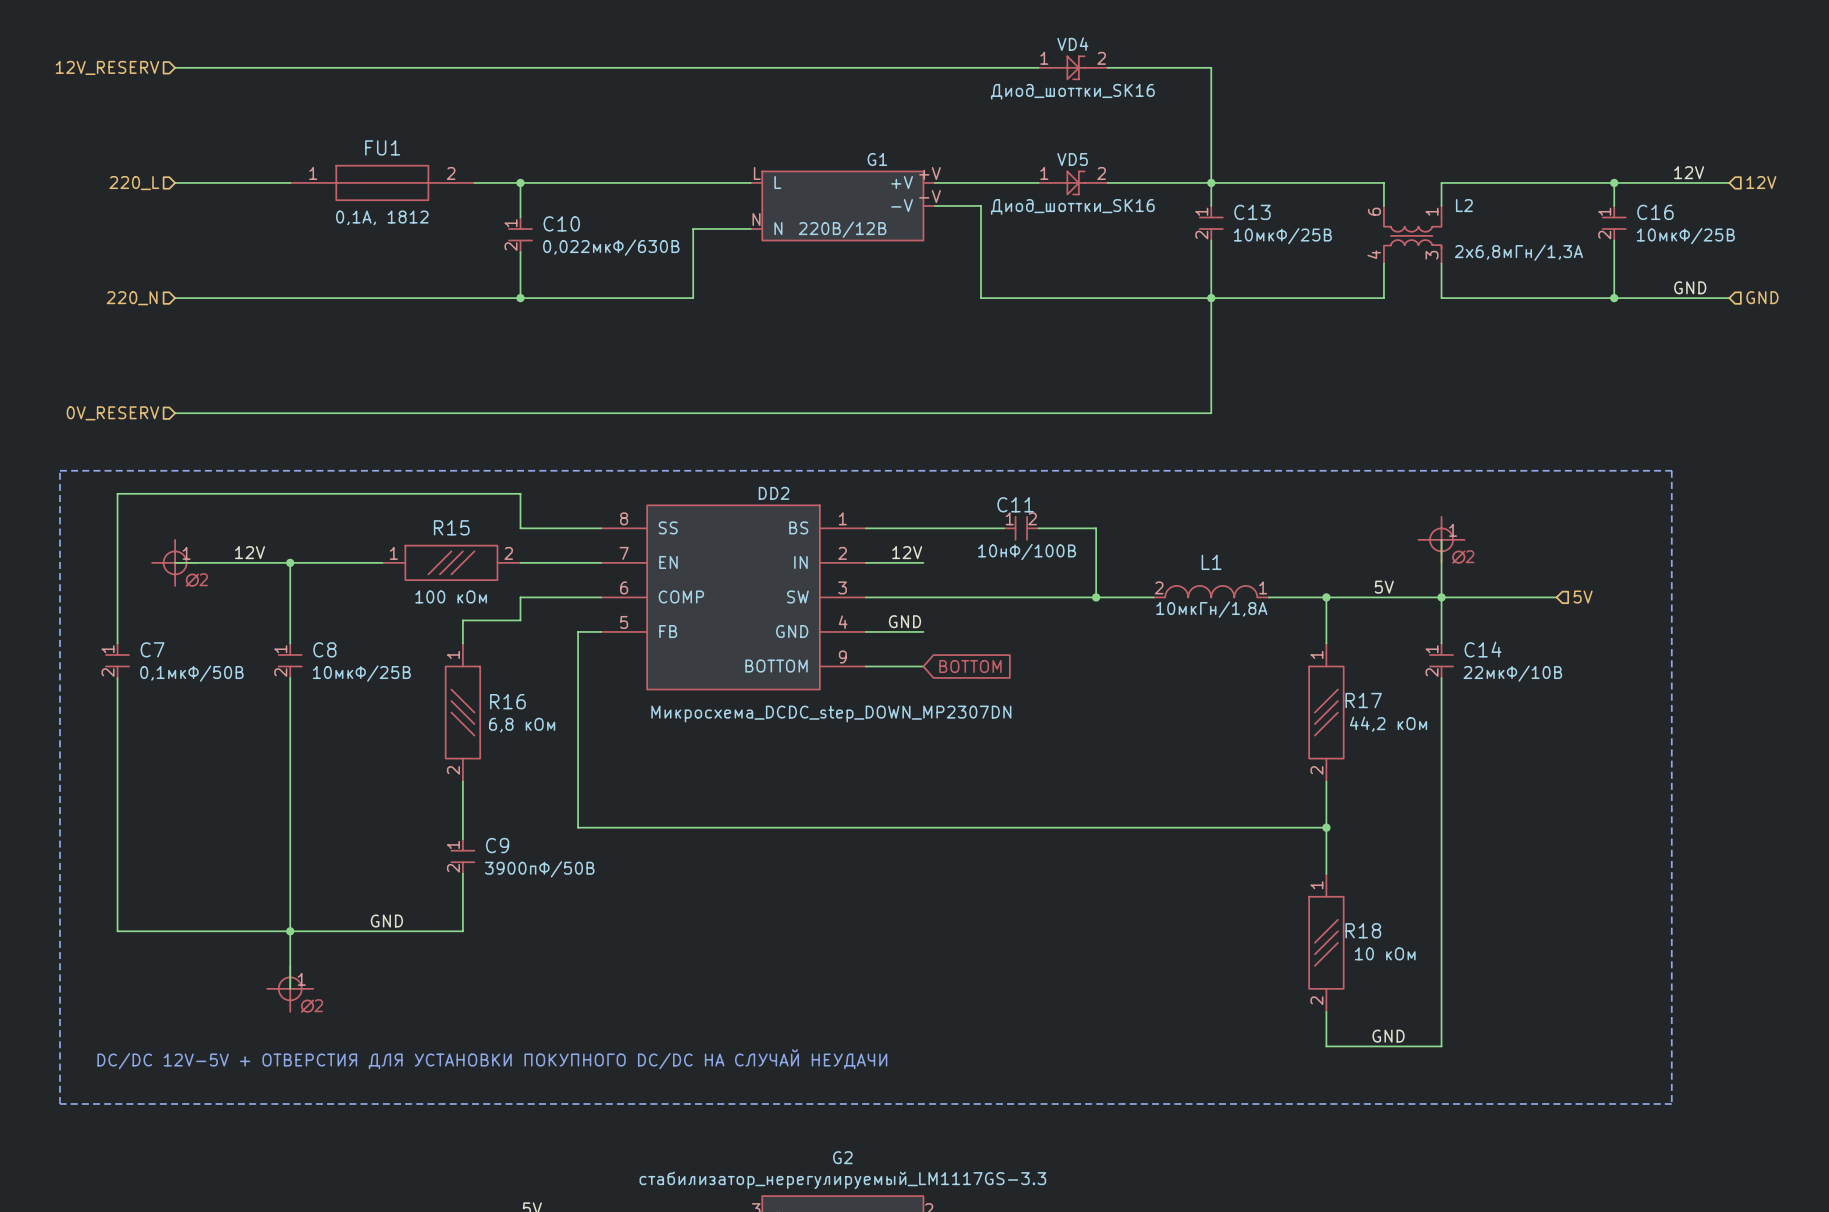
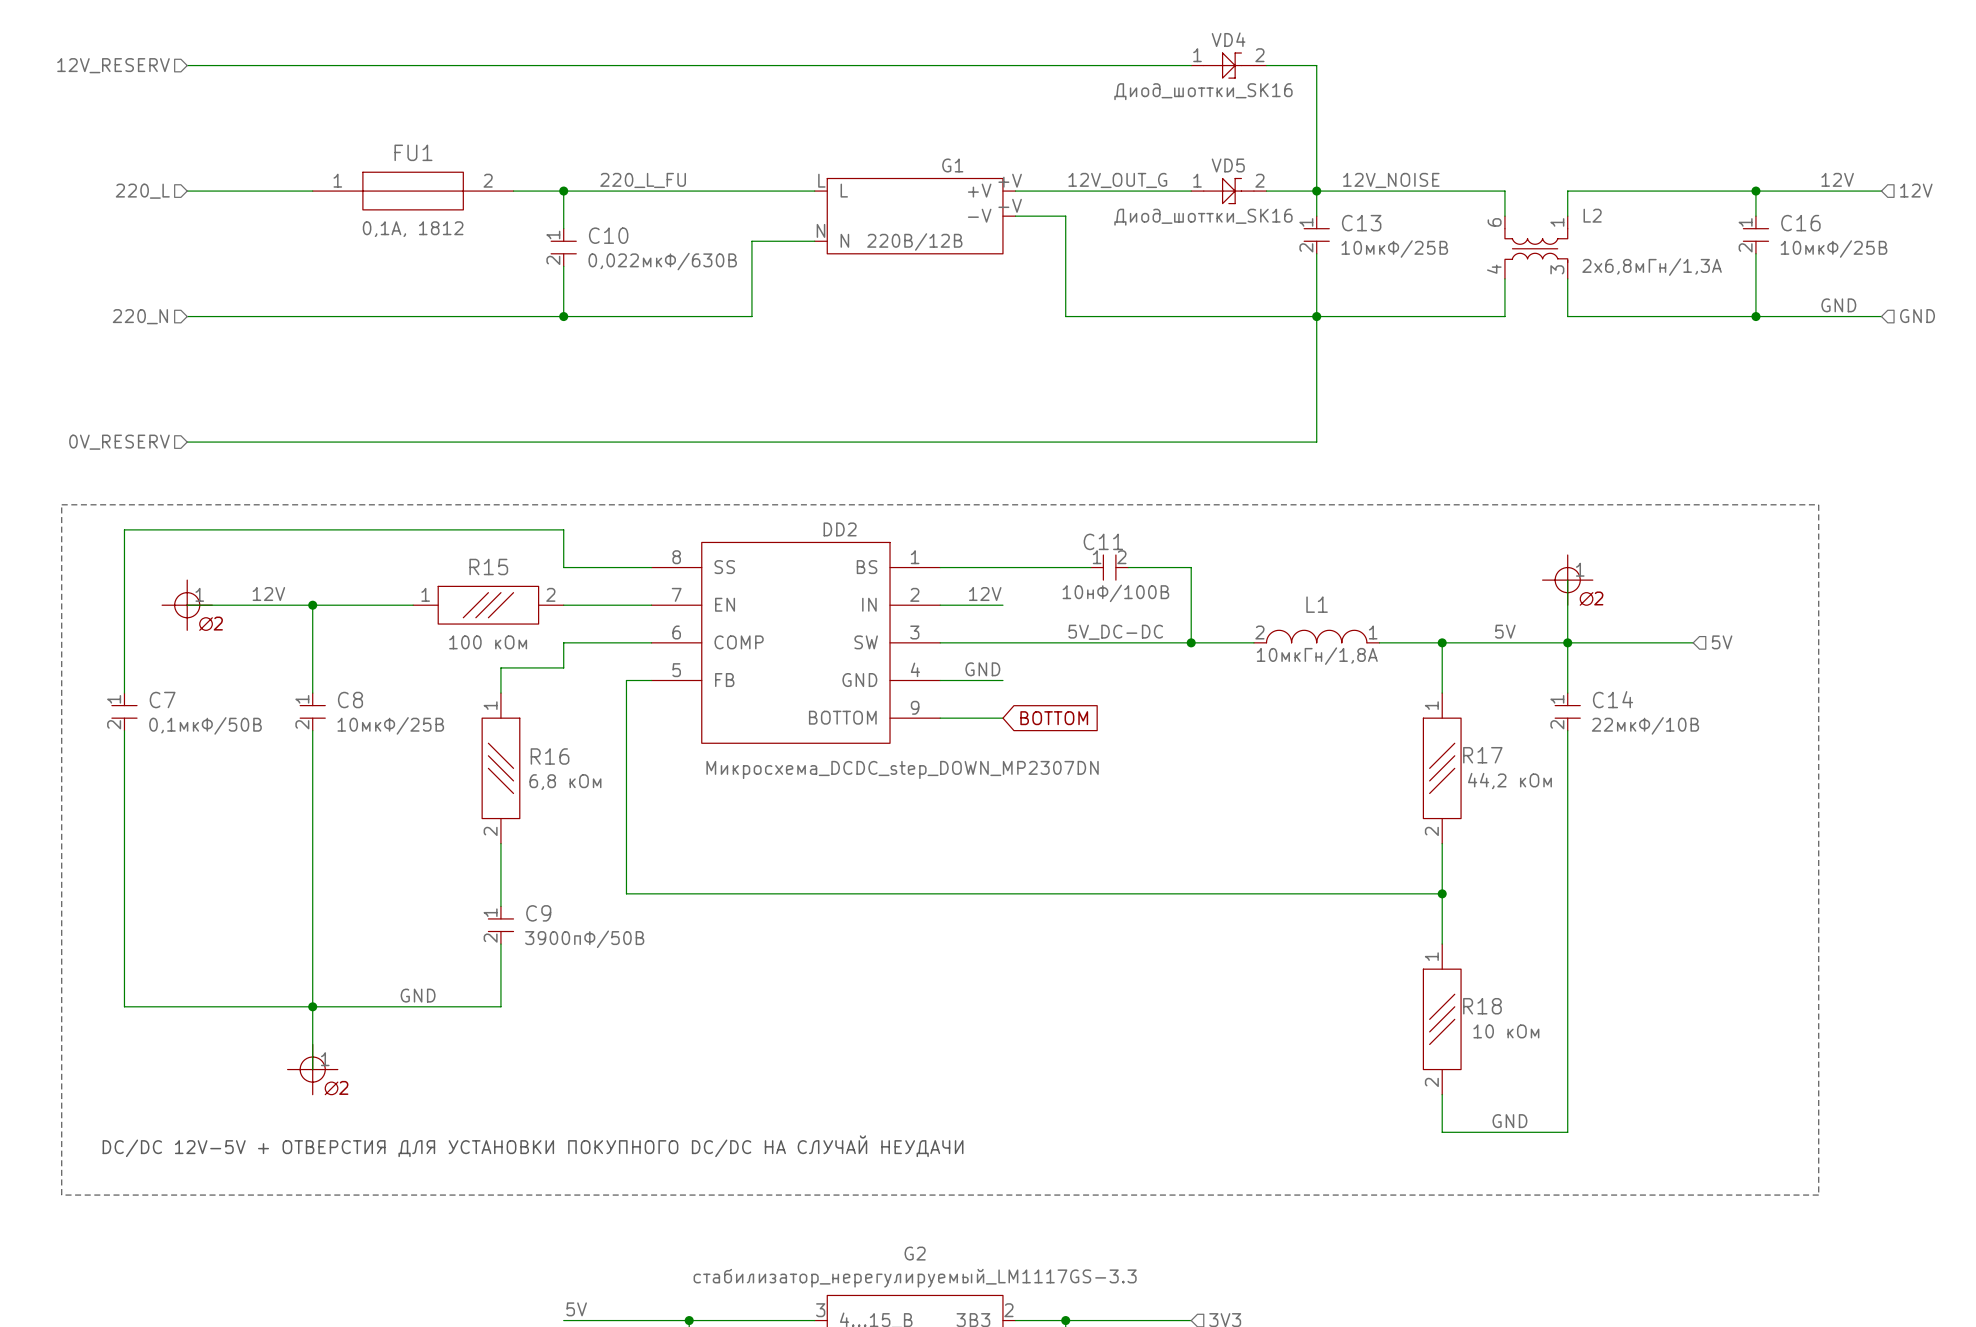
VD4 position: (1073, 67) -> (1228, 65)
VD4 value position: Диод_шоттки_SK16 (1072, 91) -> Диод_шоттки_SK16 (1203, 91)
label: none -> 220_L_FU (643, 180)
label: none -> 12V_OUT_G (1117, 180)
label: none -> 12V_NOISE (1391, 180)
VD5 position: (1073, 182) -> (1228, 191)
VD5 value position: Диод_шоттки_SK16 (1072, 206) -> Диод_шоттки_SK16 (1203, 217)
label: none -> 5V_DC-DC (1115, 632)

